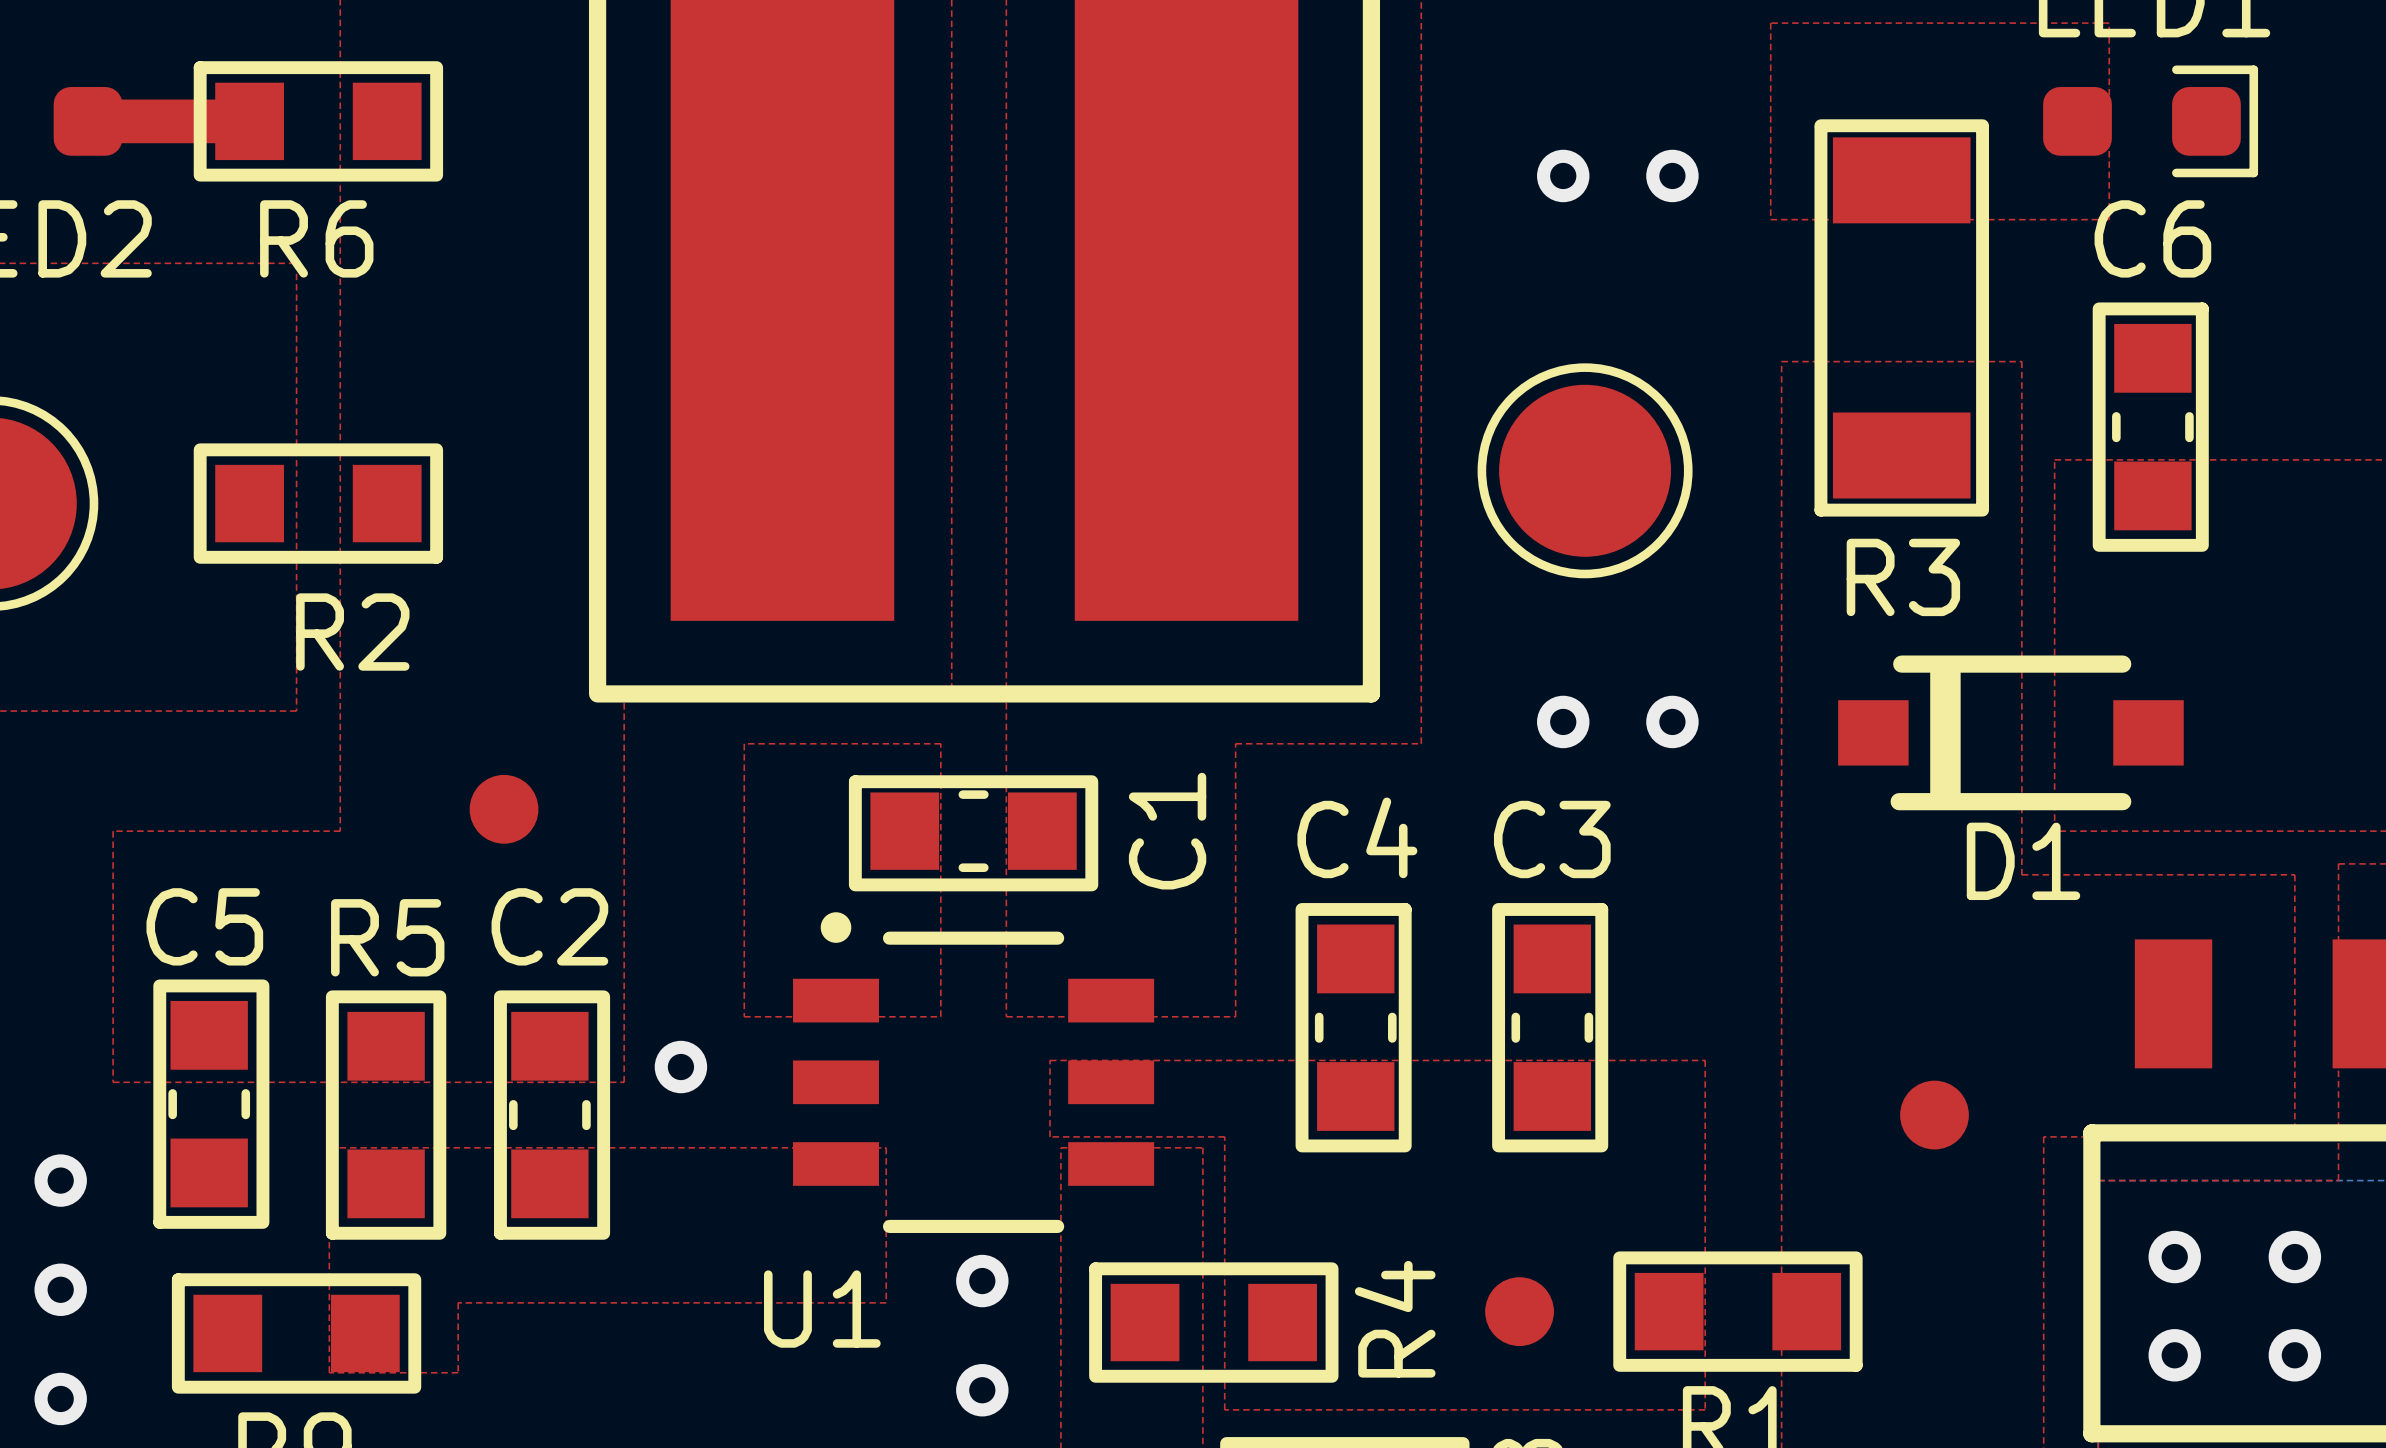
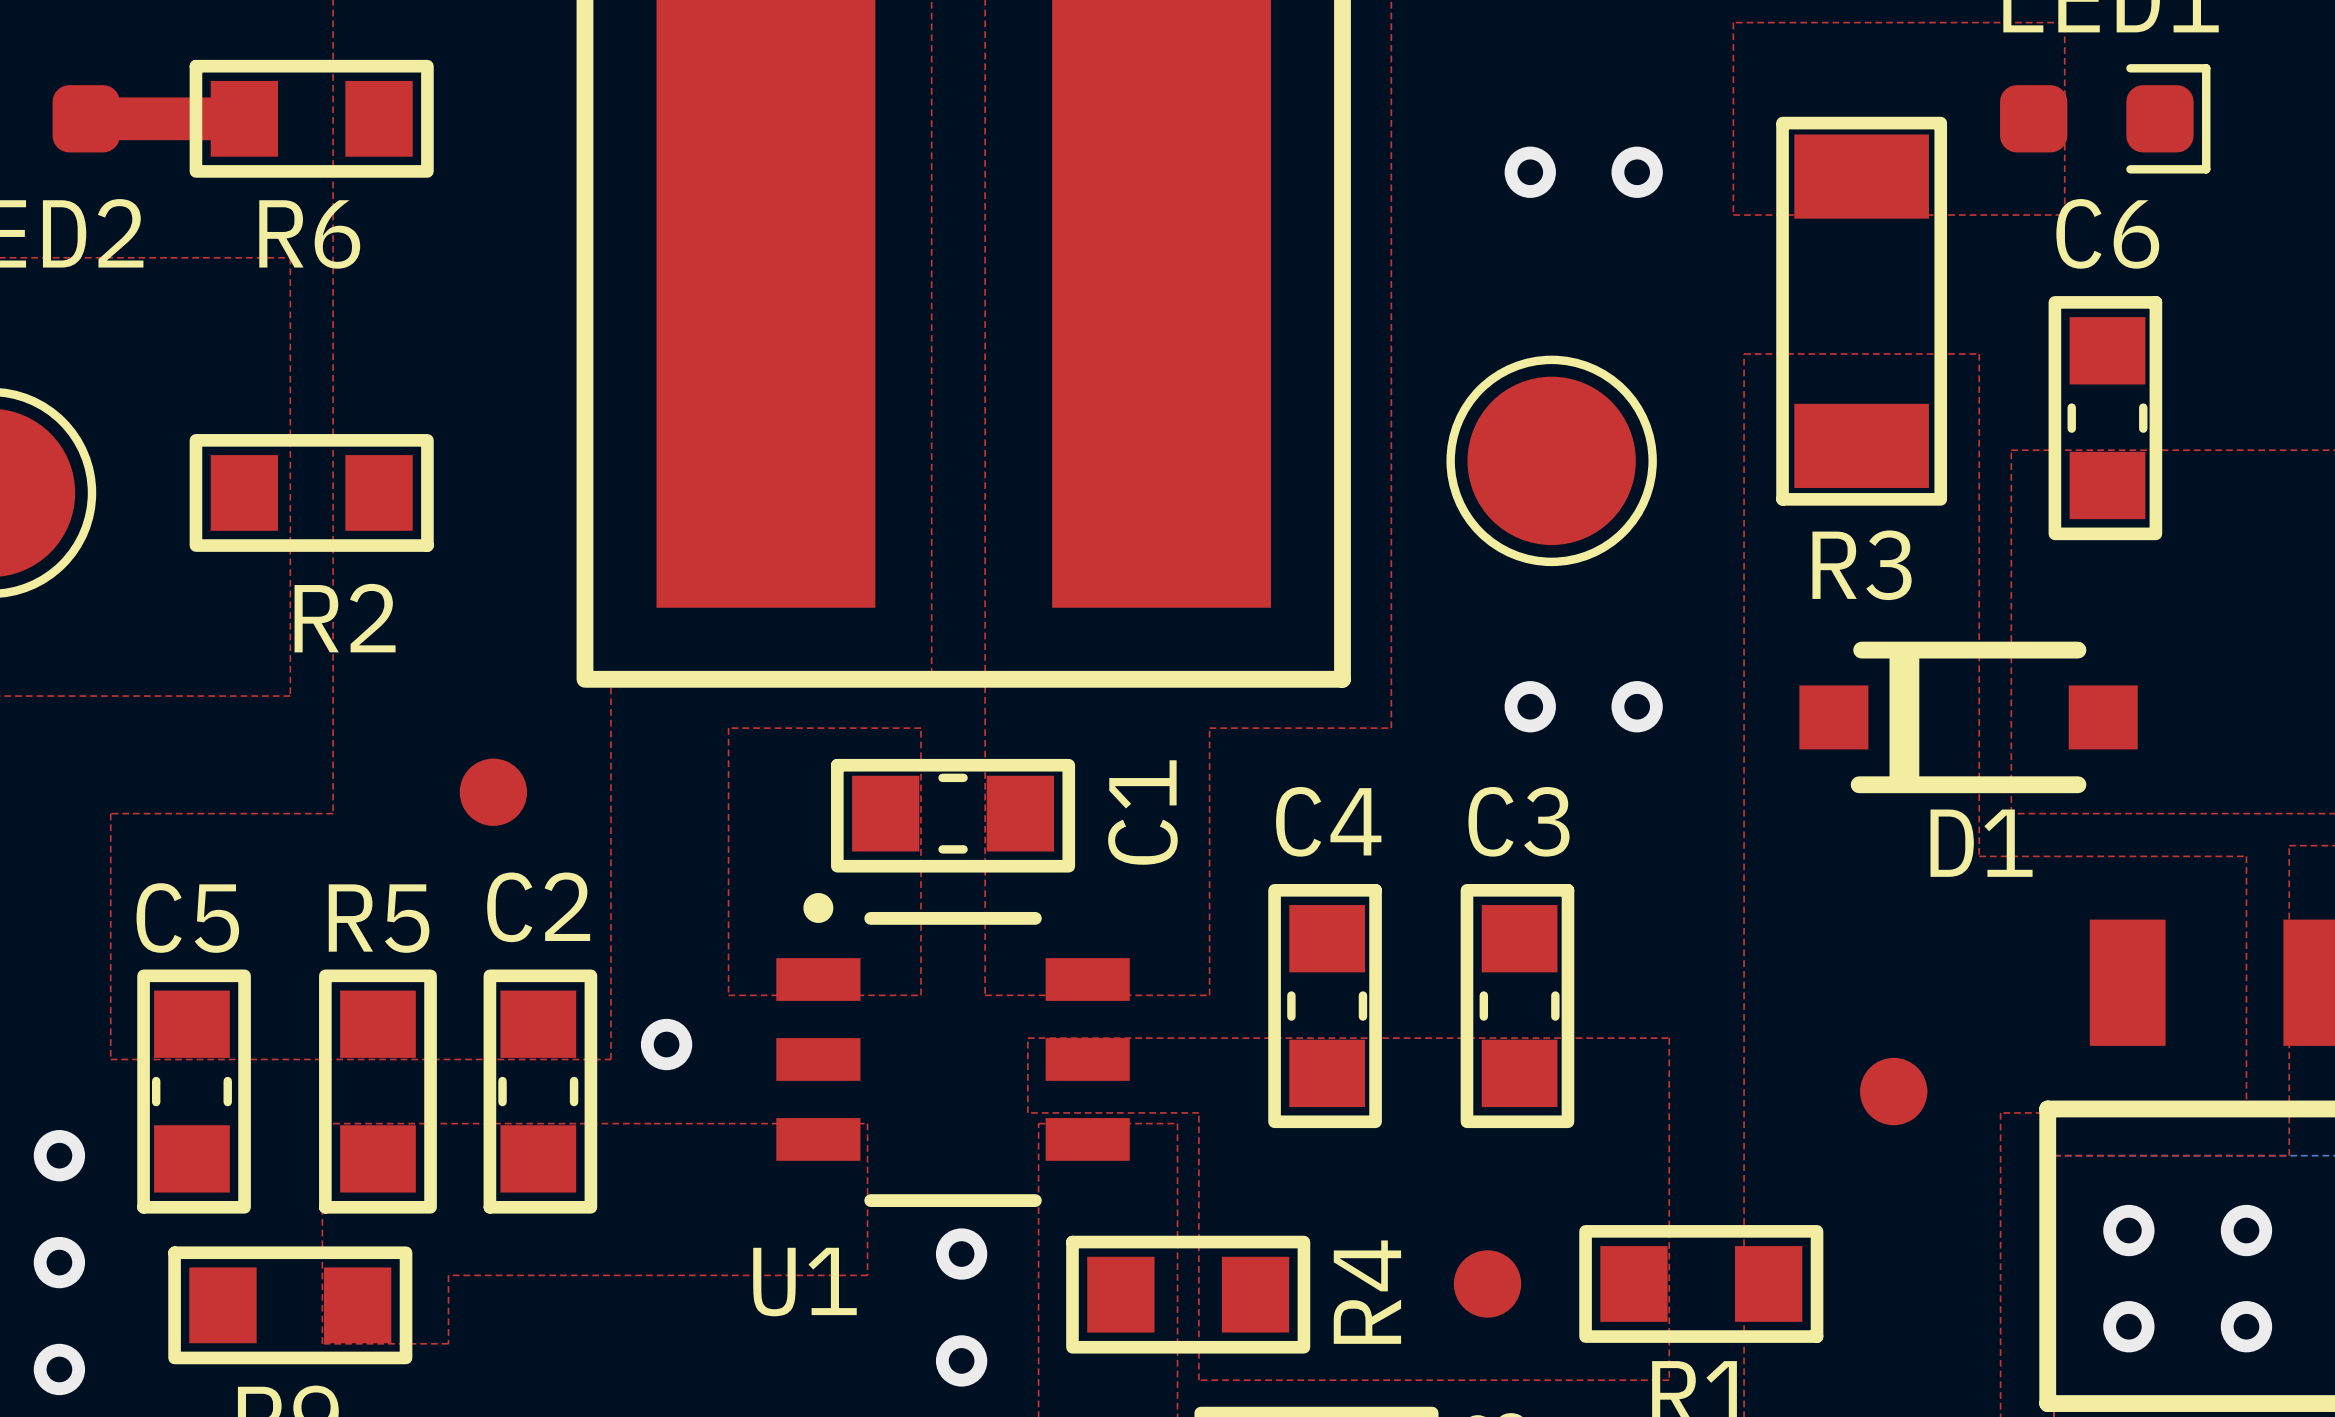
C5 position: (211, 1104) -> (194, 1091)

